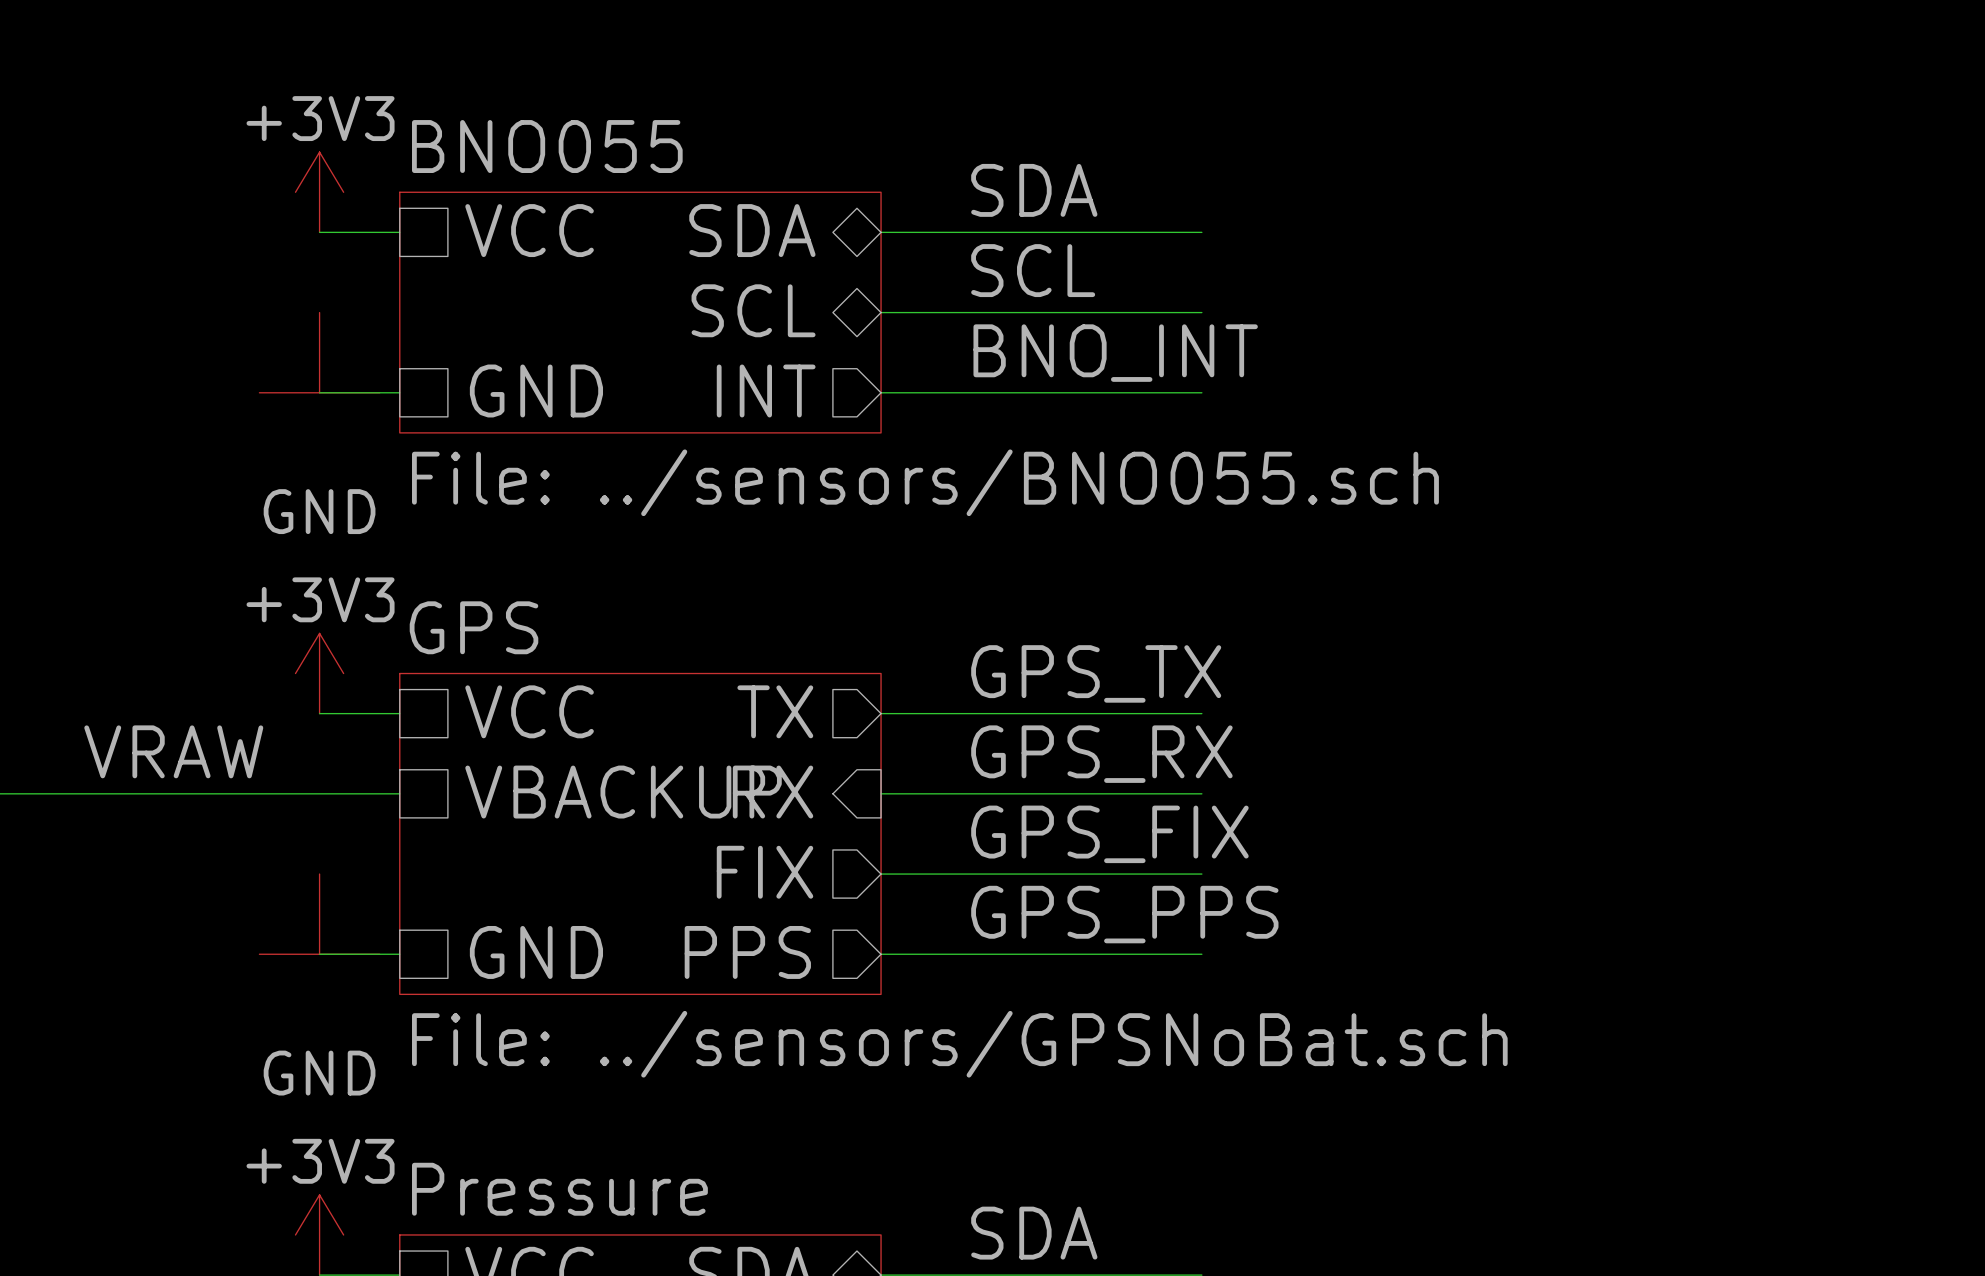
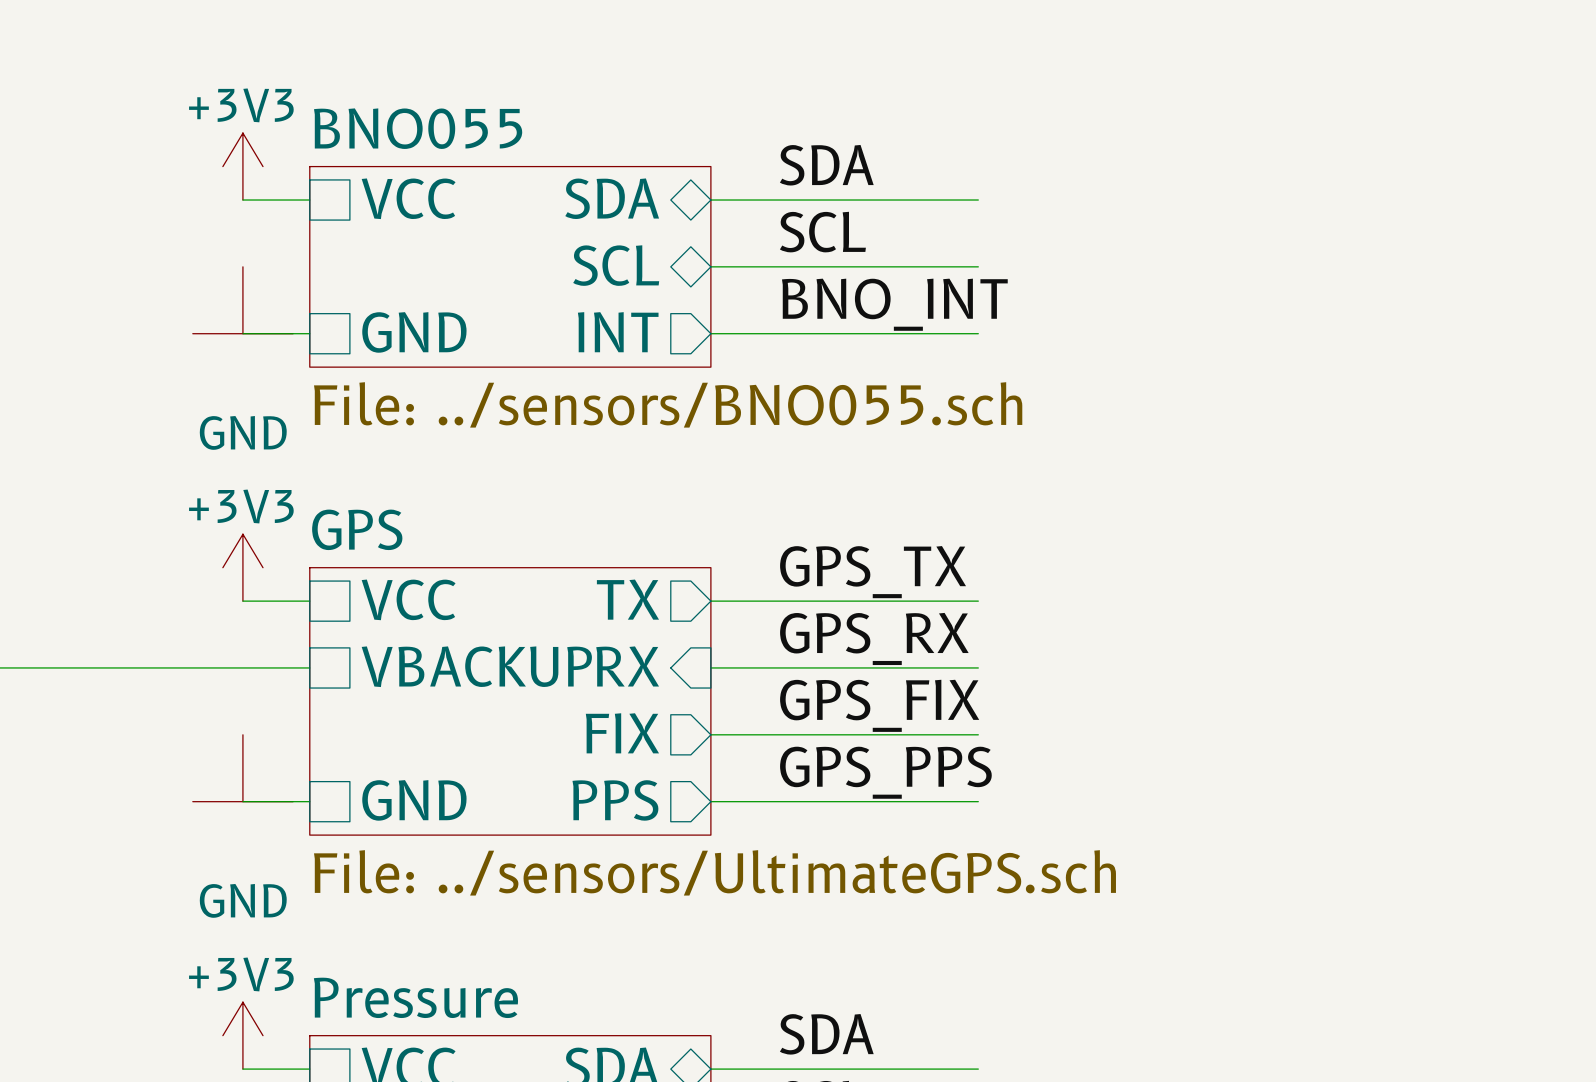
label: VRAW (173, 751) -> none
sheet GPS value: File: ../sensors/GPSNoBat.sch (959, 1044) -> File: ../sensors/UltimateGPS.sch (714, 872)

